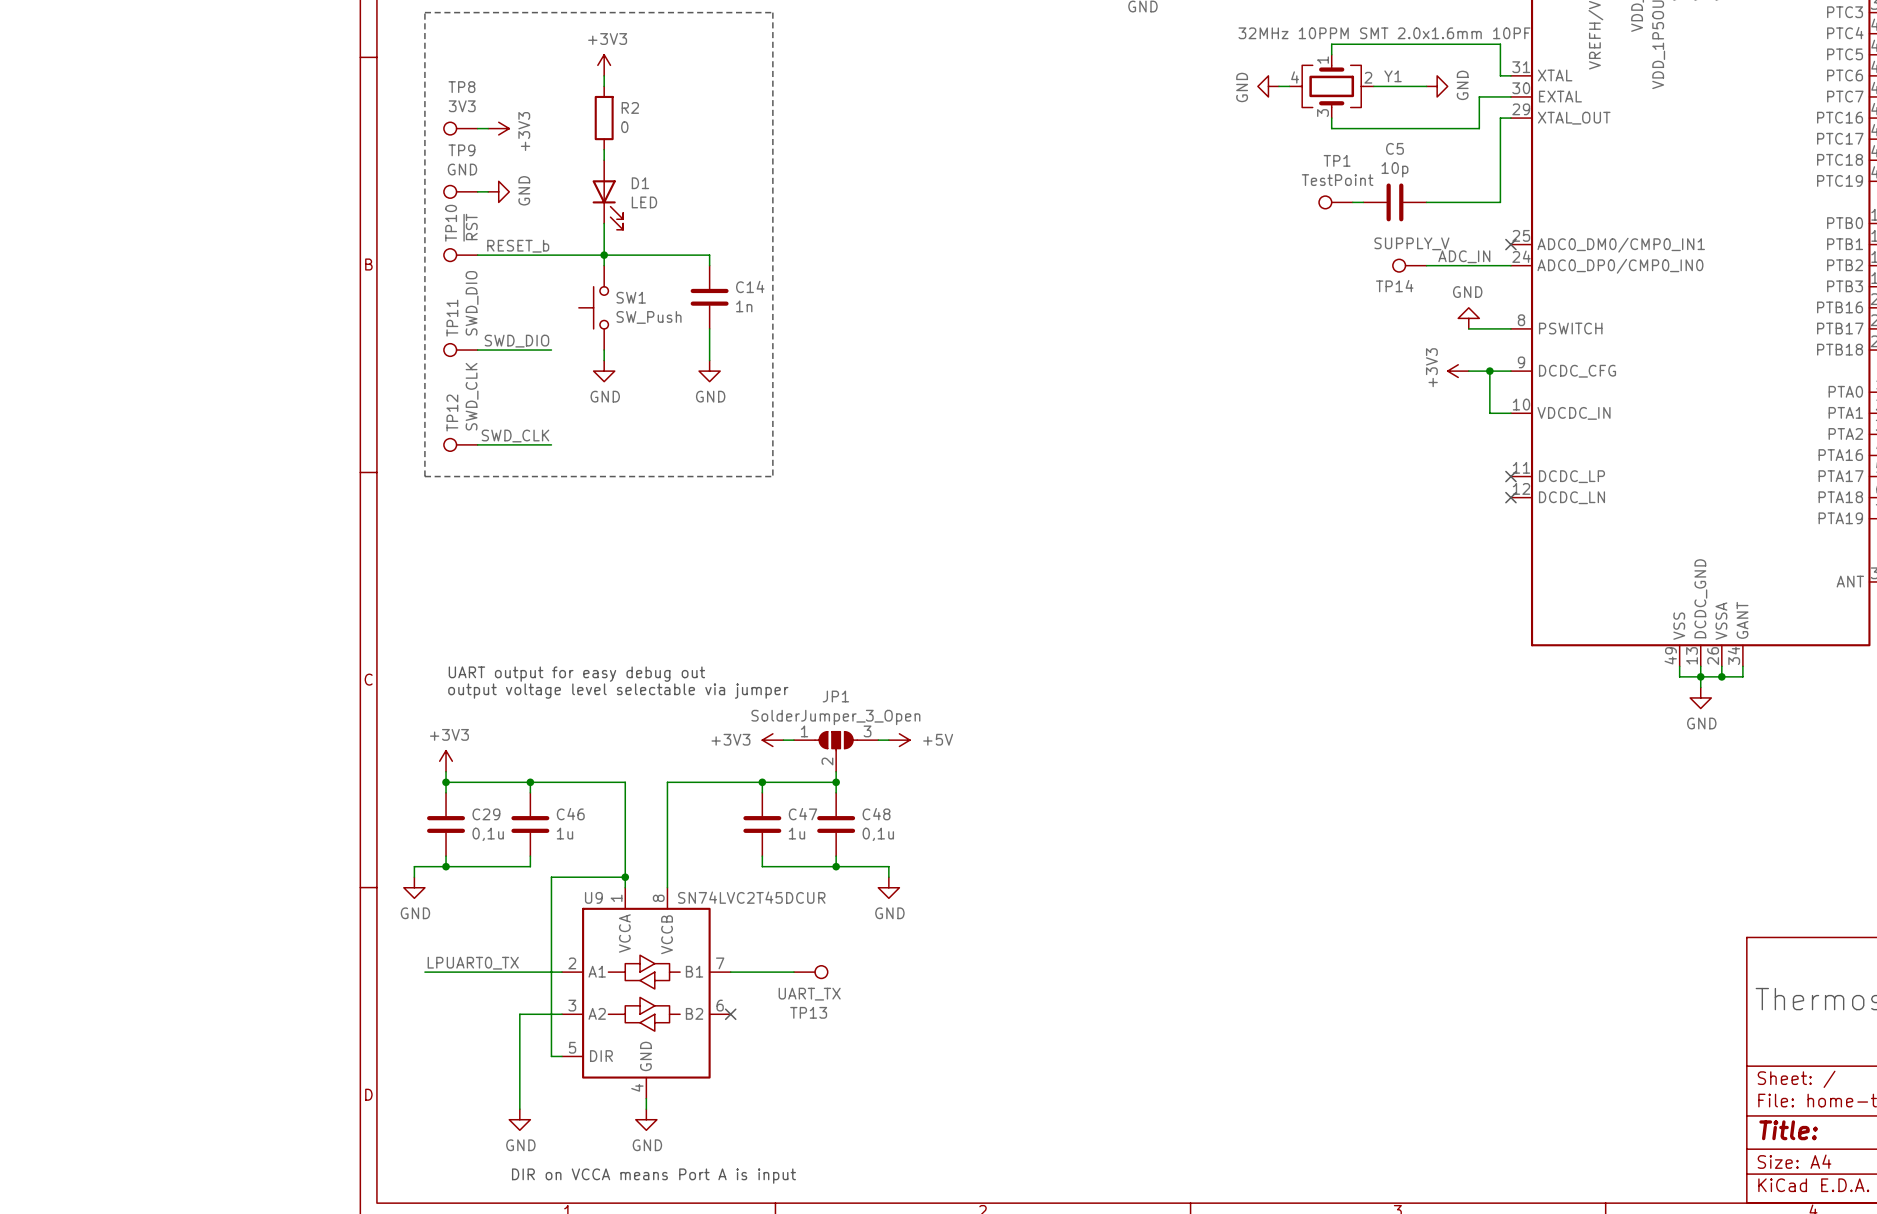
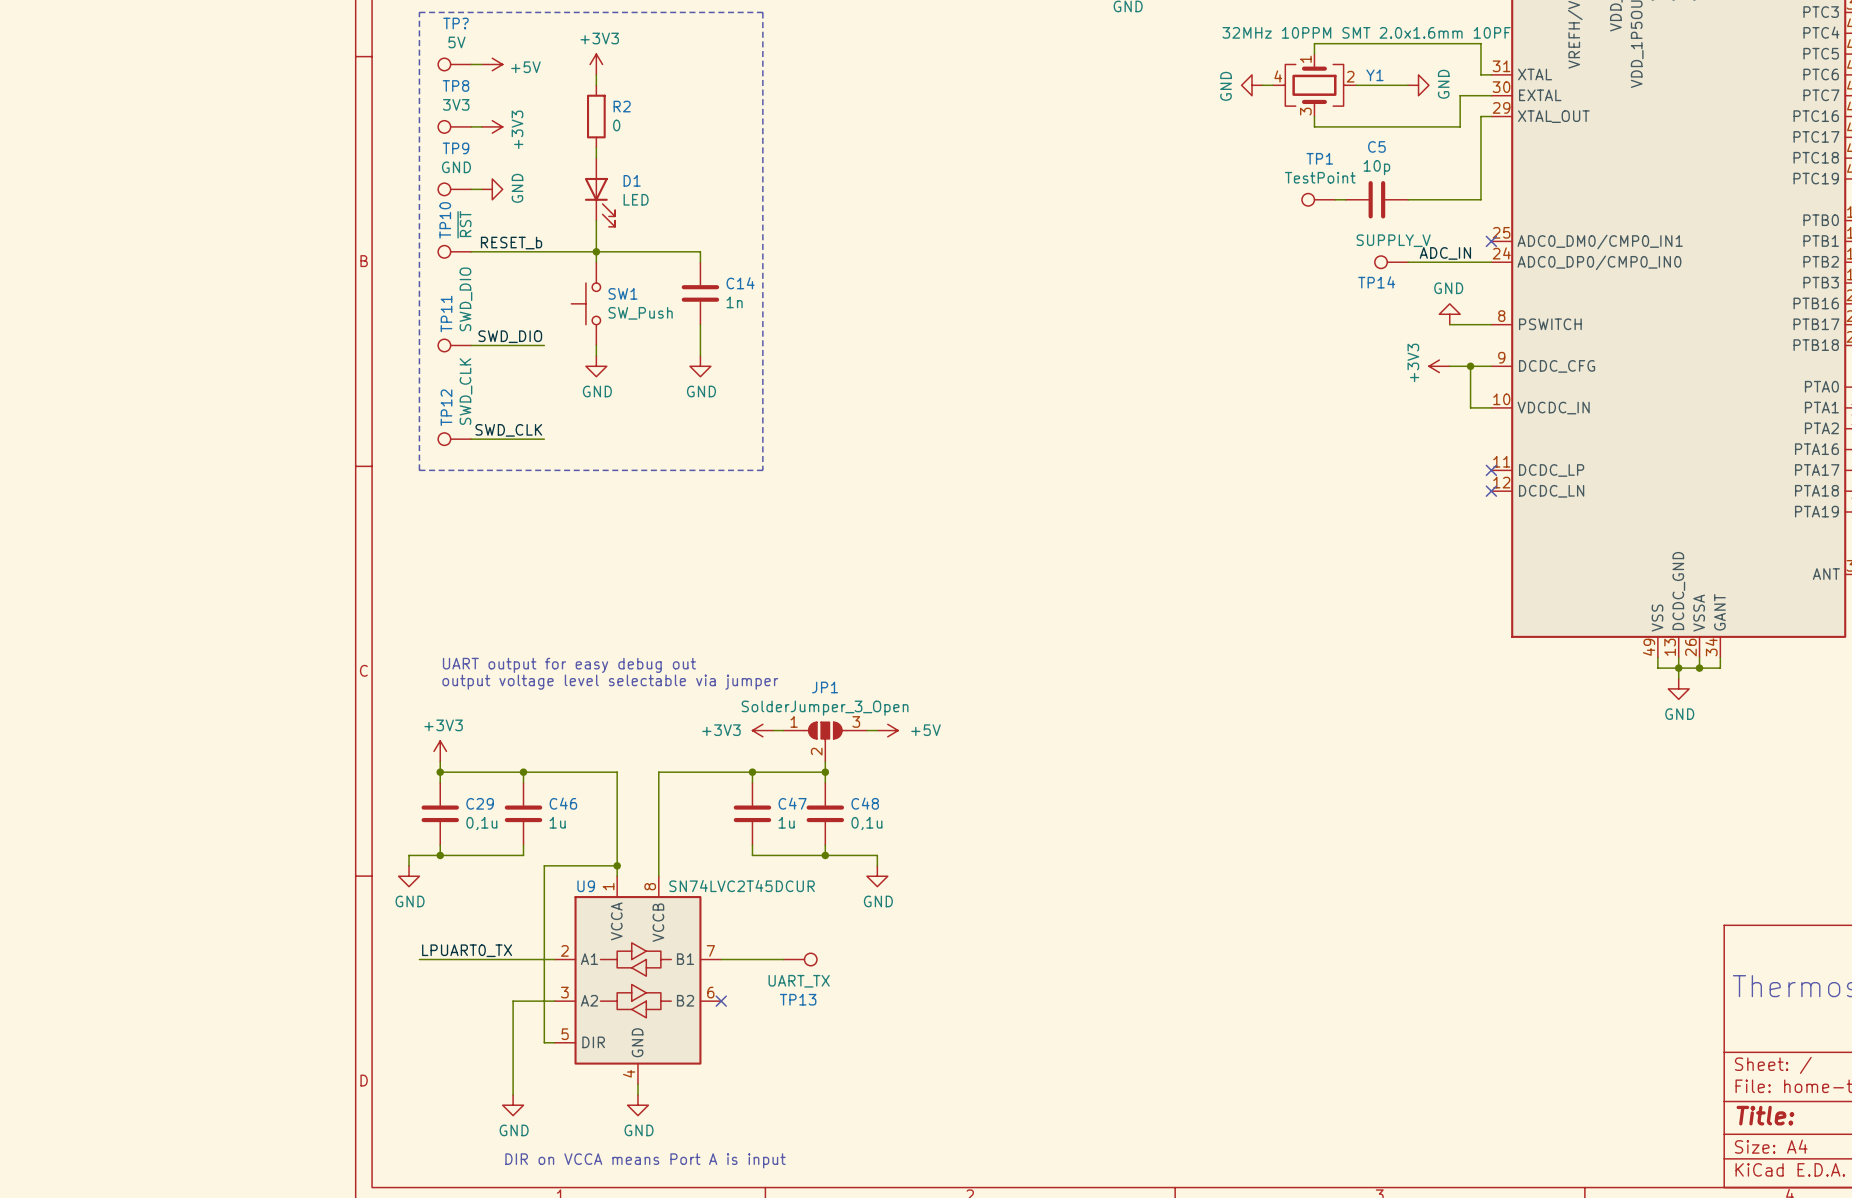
TP?: none -> 5V (454, 64)
wire: none -> (471, 64) (481, 64)
power symbol: none -> +5V (492, 64)

